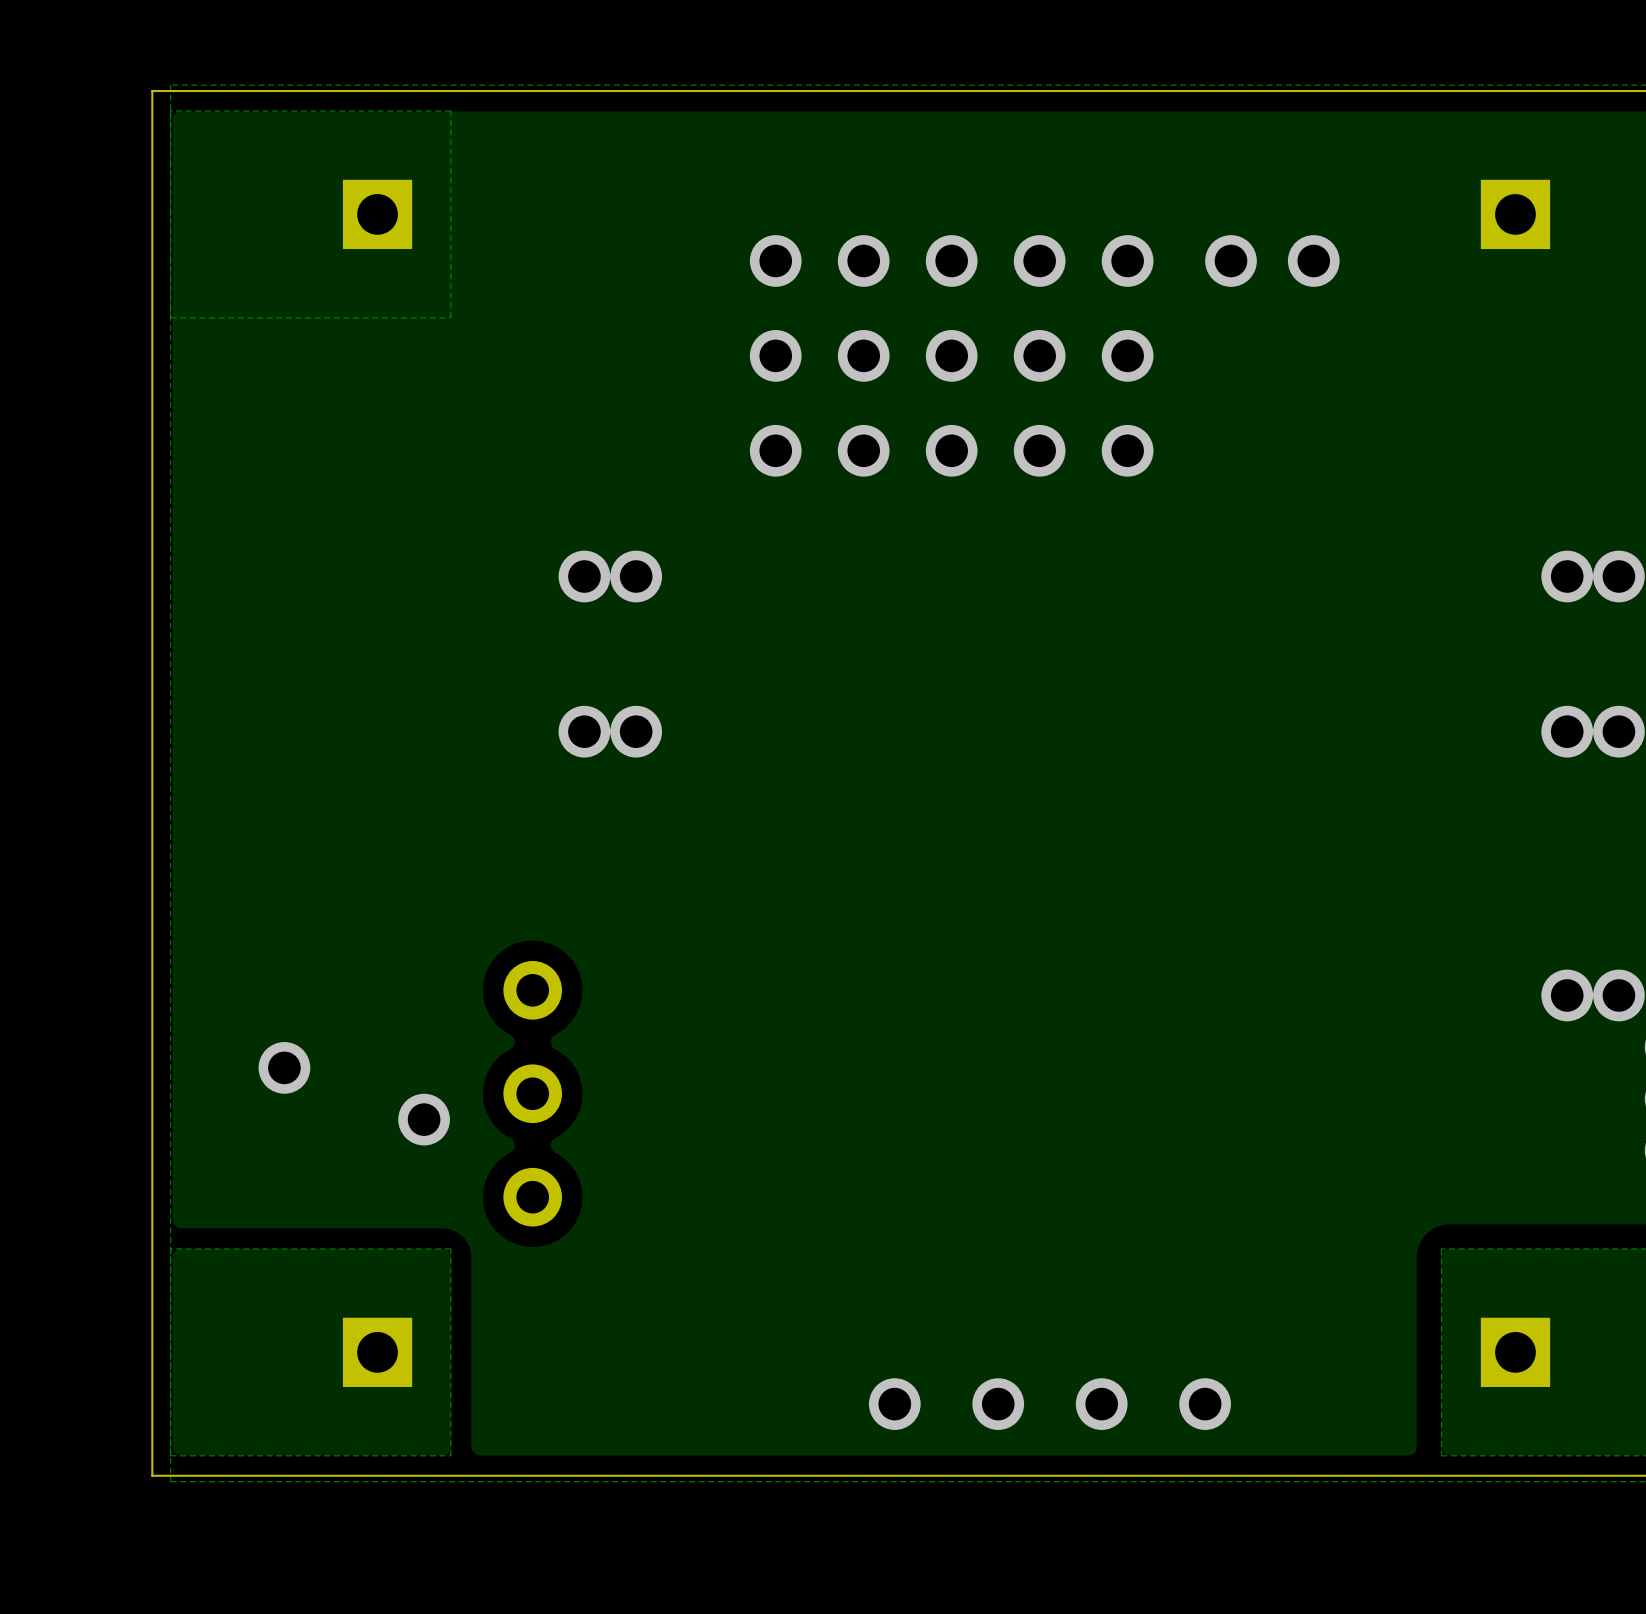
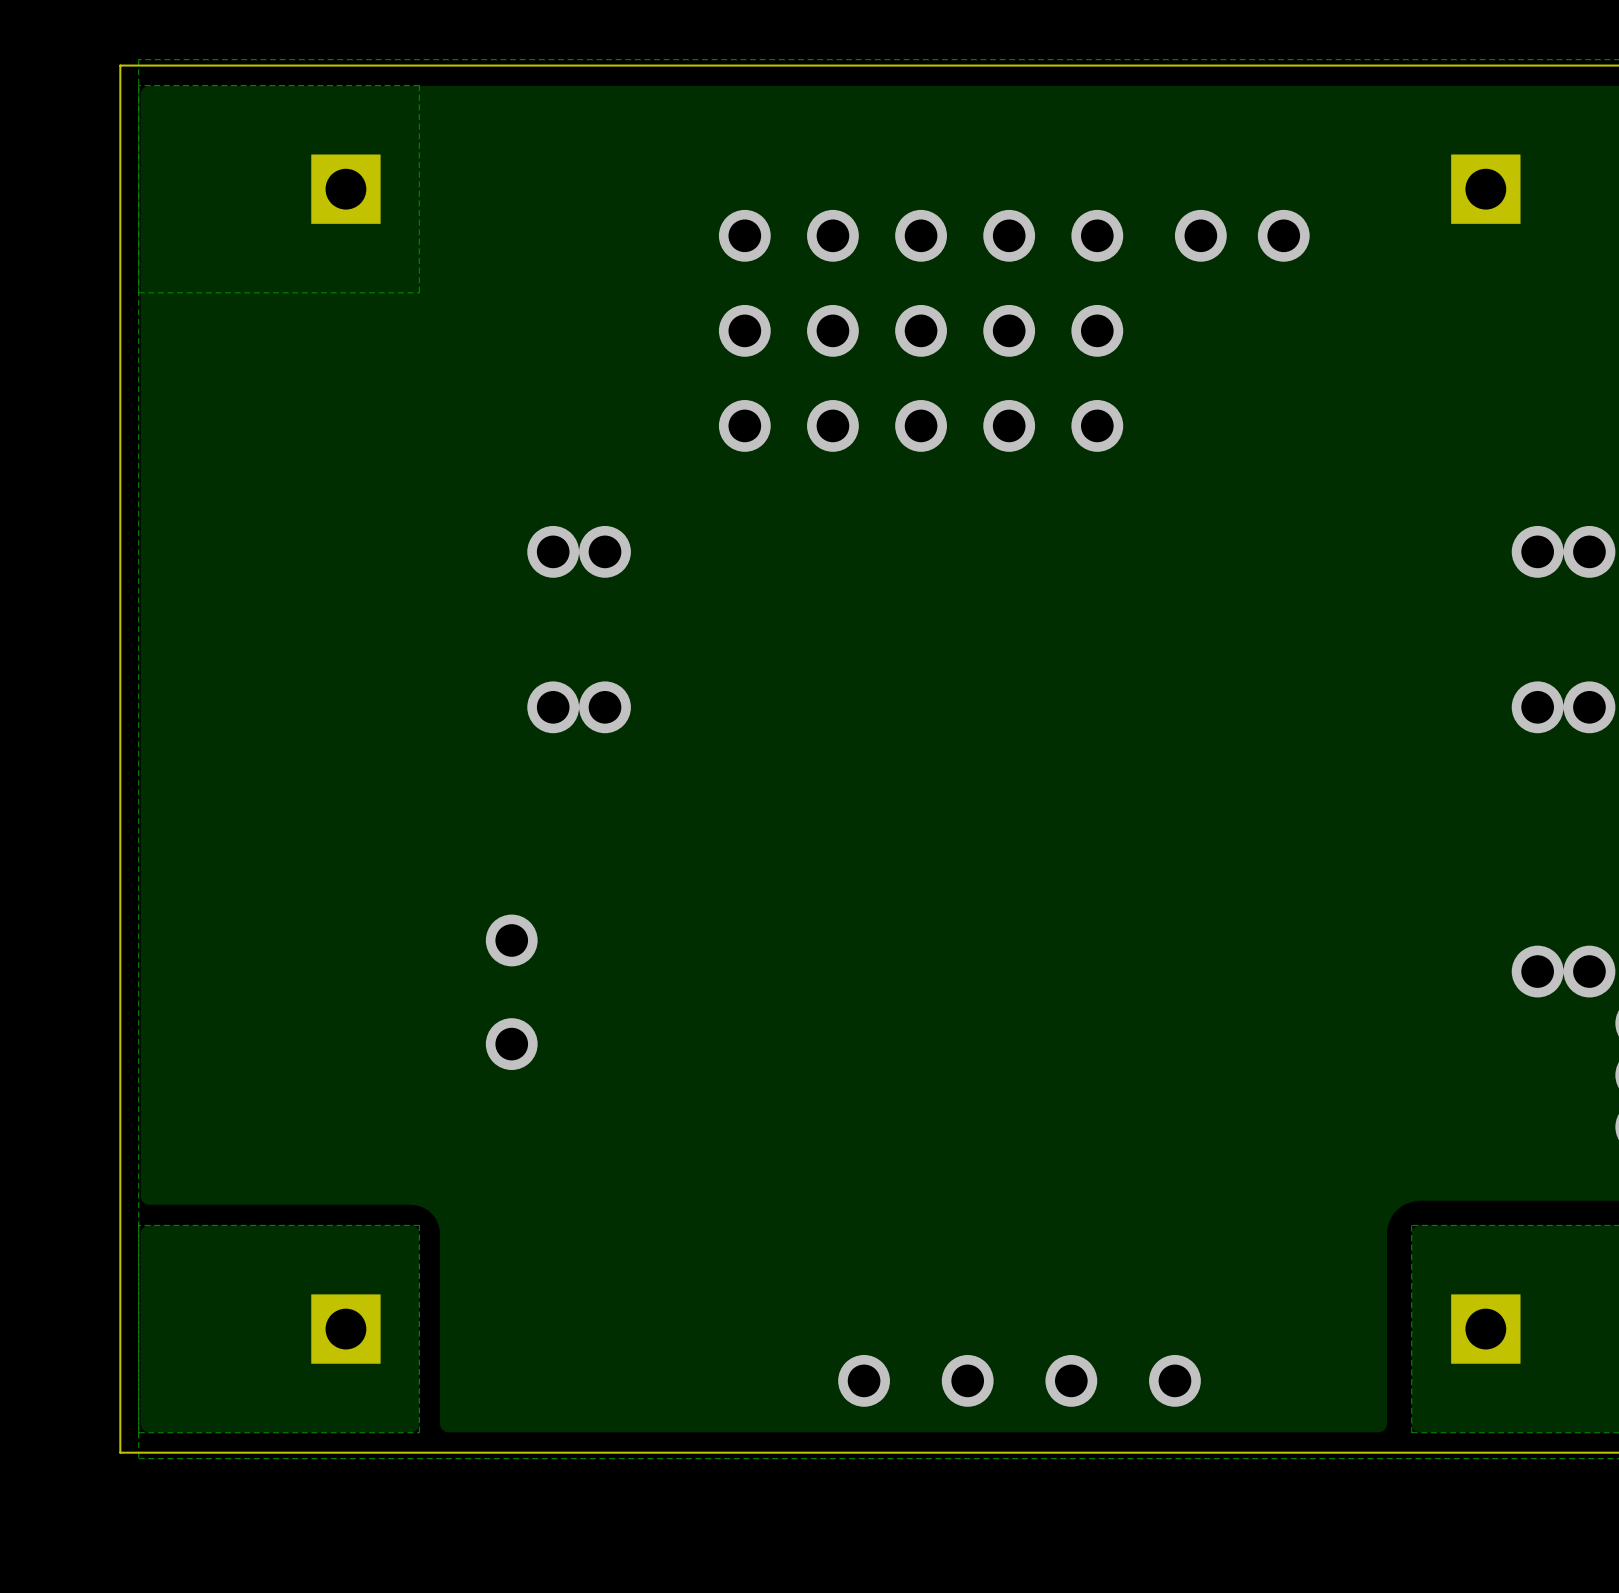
via: none -> (511, 940)
via: (284, 1067) -> none
via: none -> (511, 1044)
part: (532, 1093) -> none
via: (424, 1119) -> none

